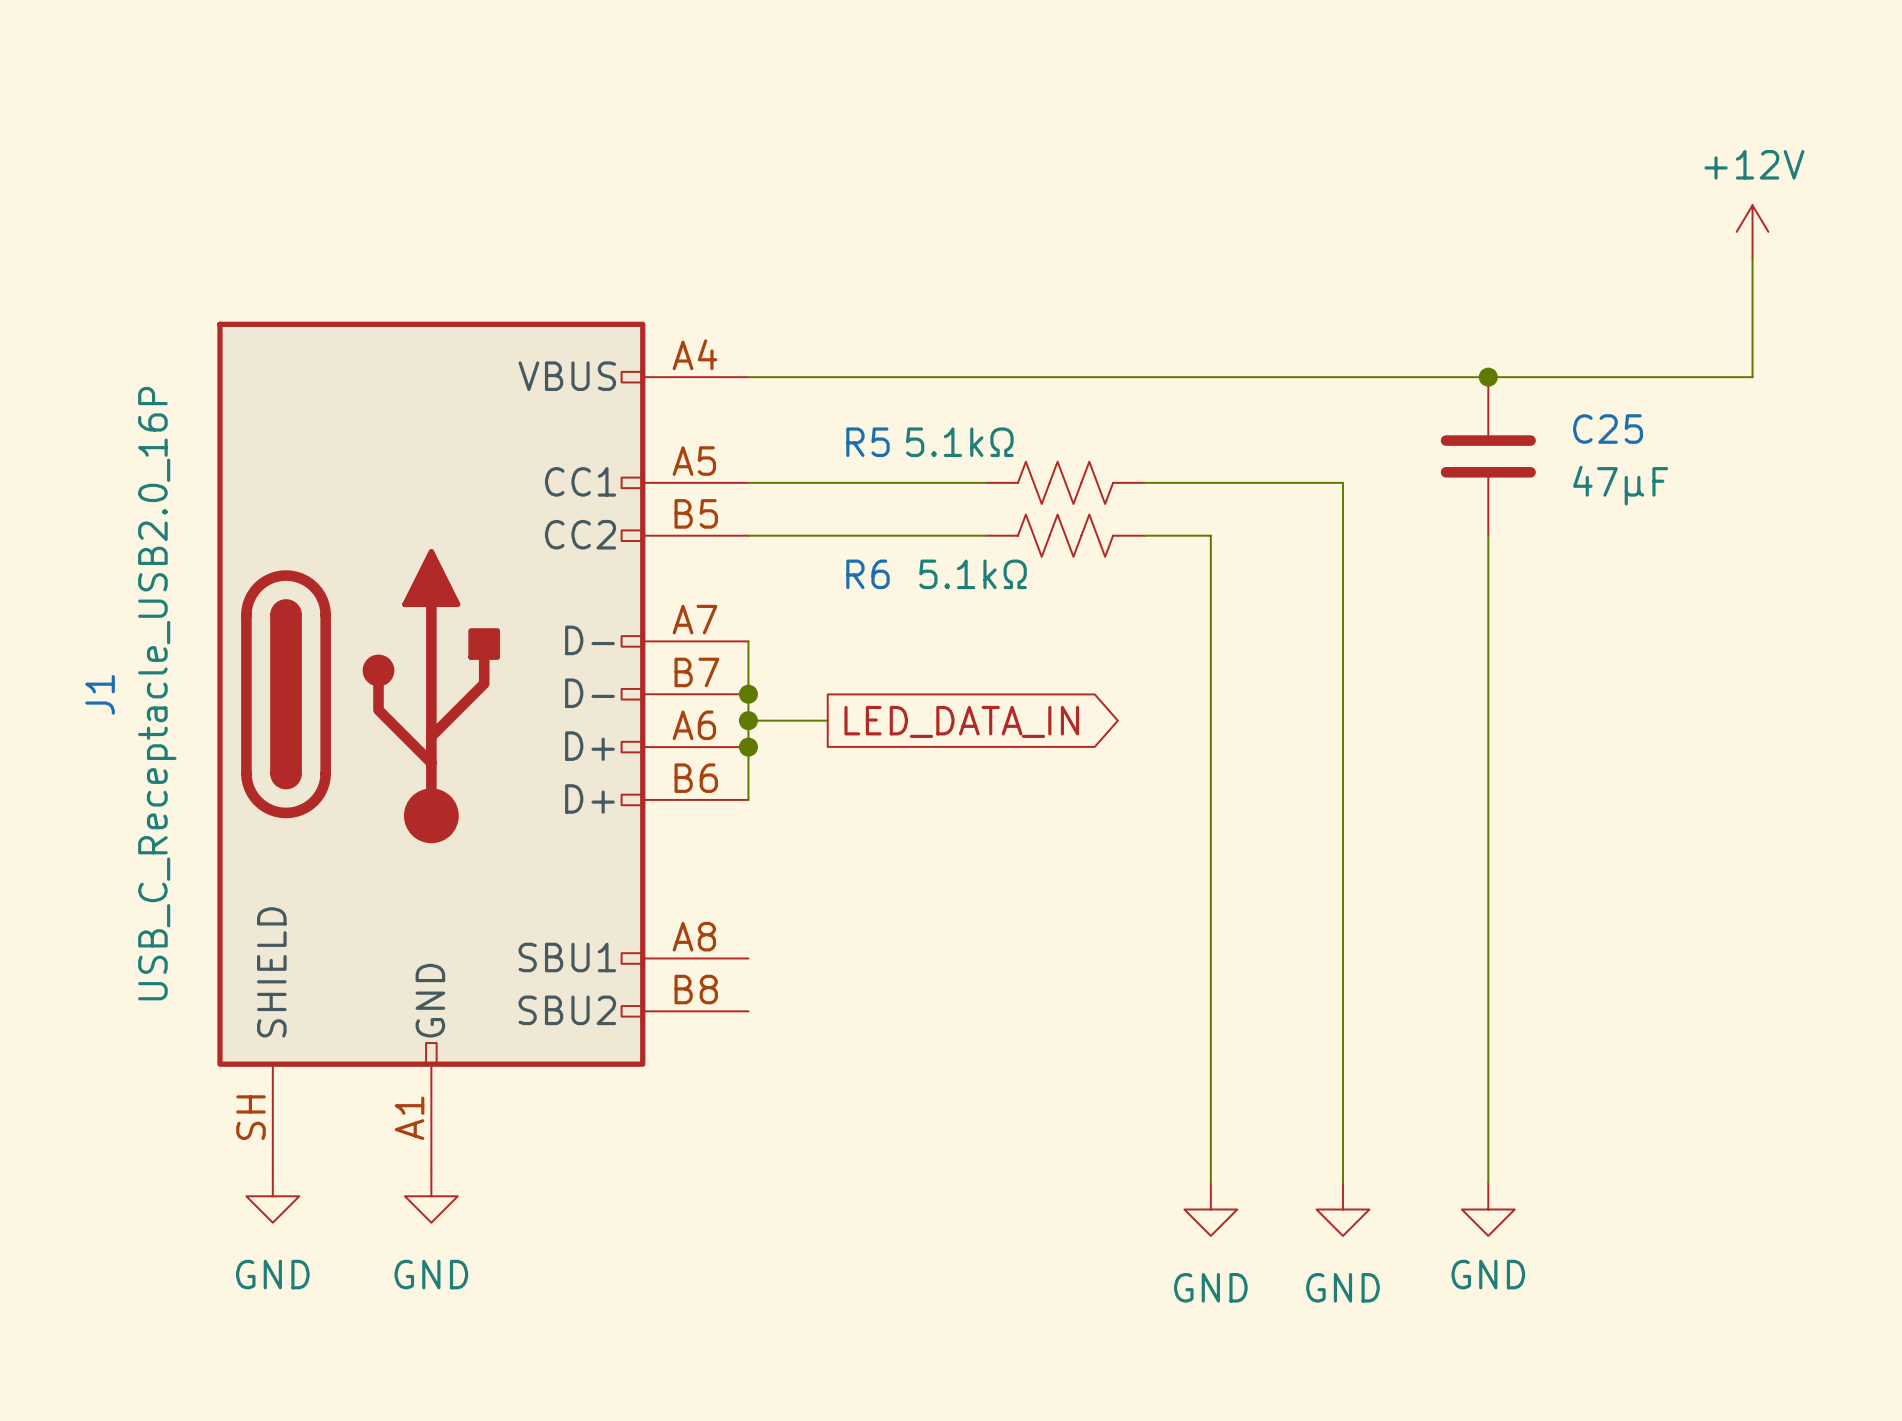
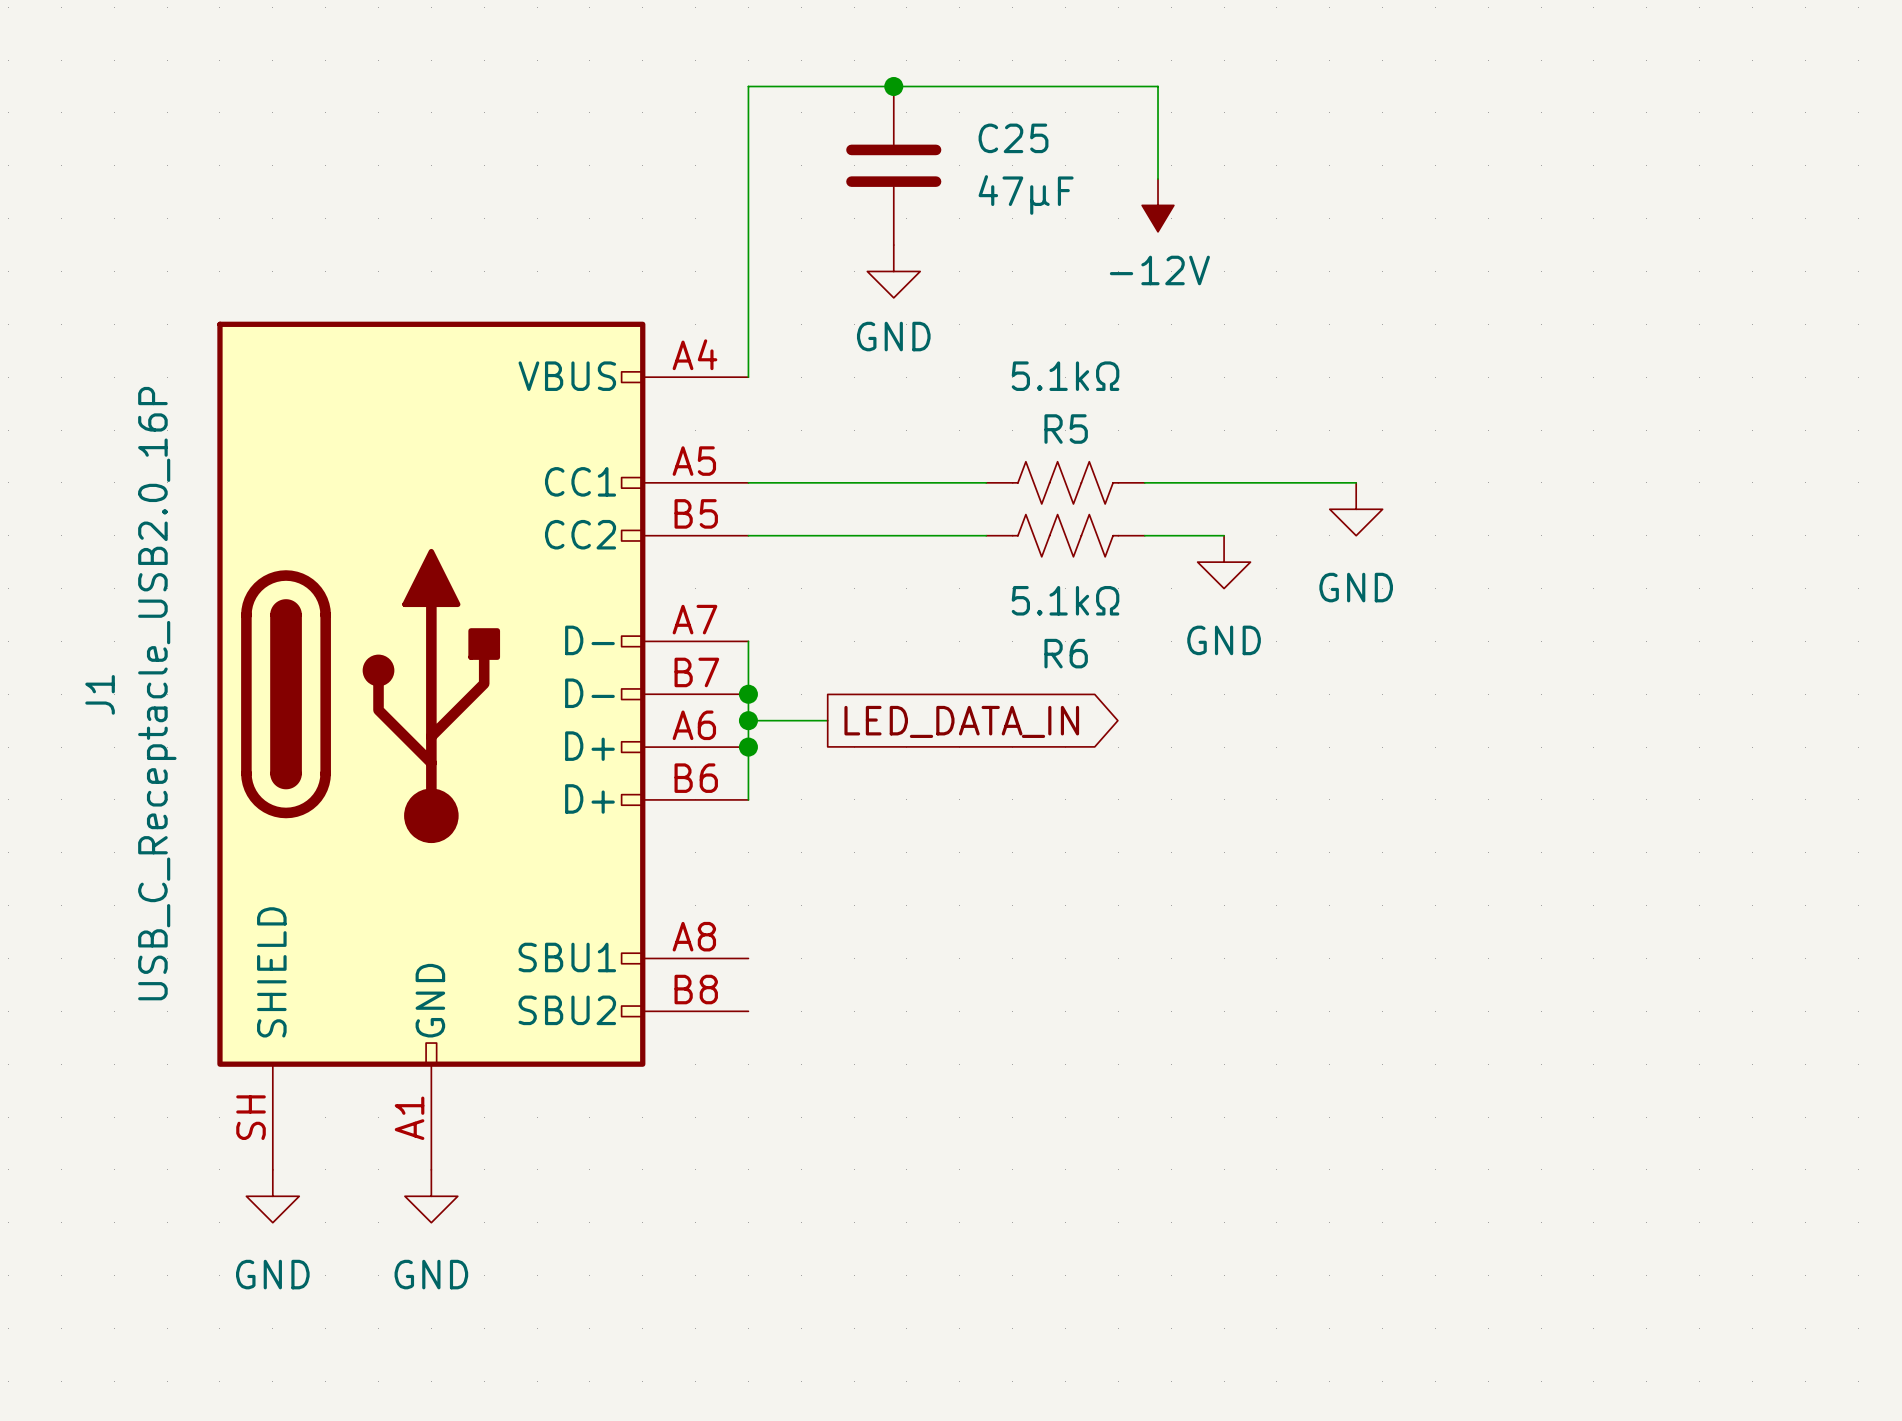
junction: none -> (893, 86)
power symbol: none -> -12V (1158, 205)
power symbol: +12V (1752, 231) -> none
wire: (1752, 258) (1752, 377) (748, 377) -> (1158, 178) (1158, 86) (748, 86) (748, 377)
power symbol: none -> GND (893, 271)
junction: (1488, 377) -> none
R5 name position: R5 (867, 442) -> R5 (1066, 429)
R5 value position: 5.1kΩ (959, 442) -> 5.1kΩ (1065, 376)
C25 position: (1488, 456) -> (893, 165)
wire: (1342, 482) (1342, 1183) -> (1342, 482) (1356, 482)
power symbol: none -> GND (1356, 509)
wire: (1210, 535) (1210, 1183) -> (1210, 535) (1224, 535)
wire: (1488, 535) (1488, 1183) -> none
power symbol: none -> GND (1224, 562)
R6 name position: R6 (867, 574) -> R6 (1066, 653)
R6 value position: 5.1kΩ (973, 574) -> 5.1kΩ (1065, 600)
power symbol: GND (1210, 1209) -> none
power symbol: GND (1342, 1209) -> none
power symbol: GND (1488, 1209) -> none

